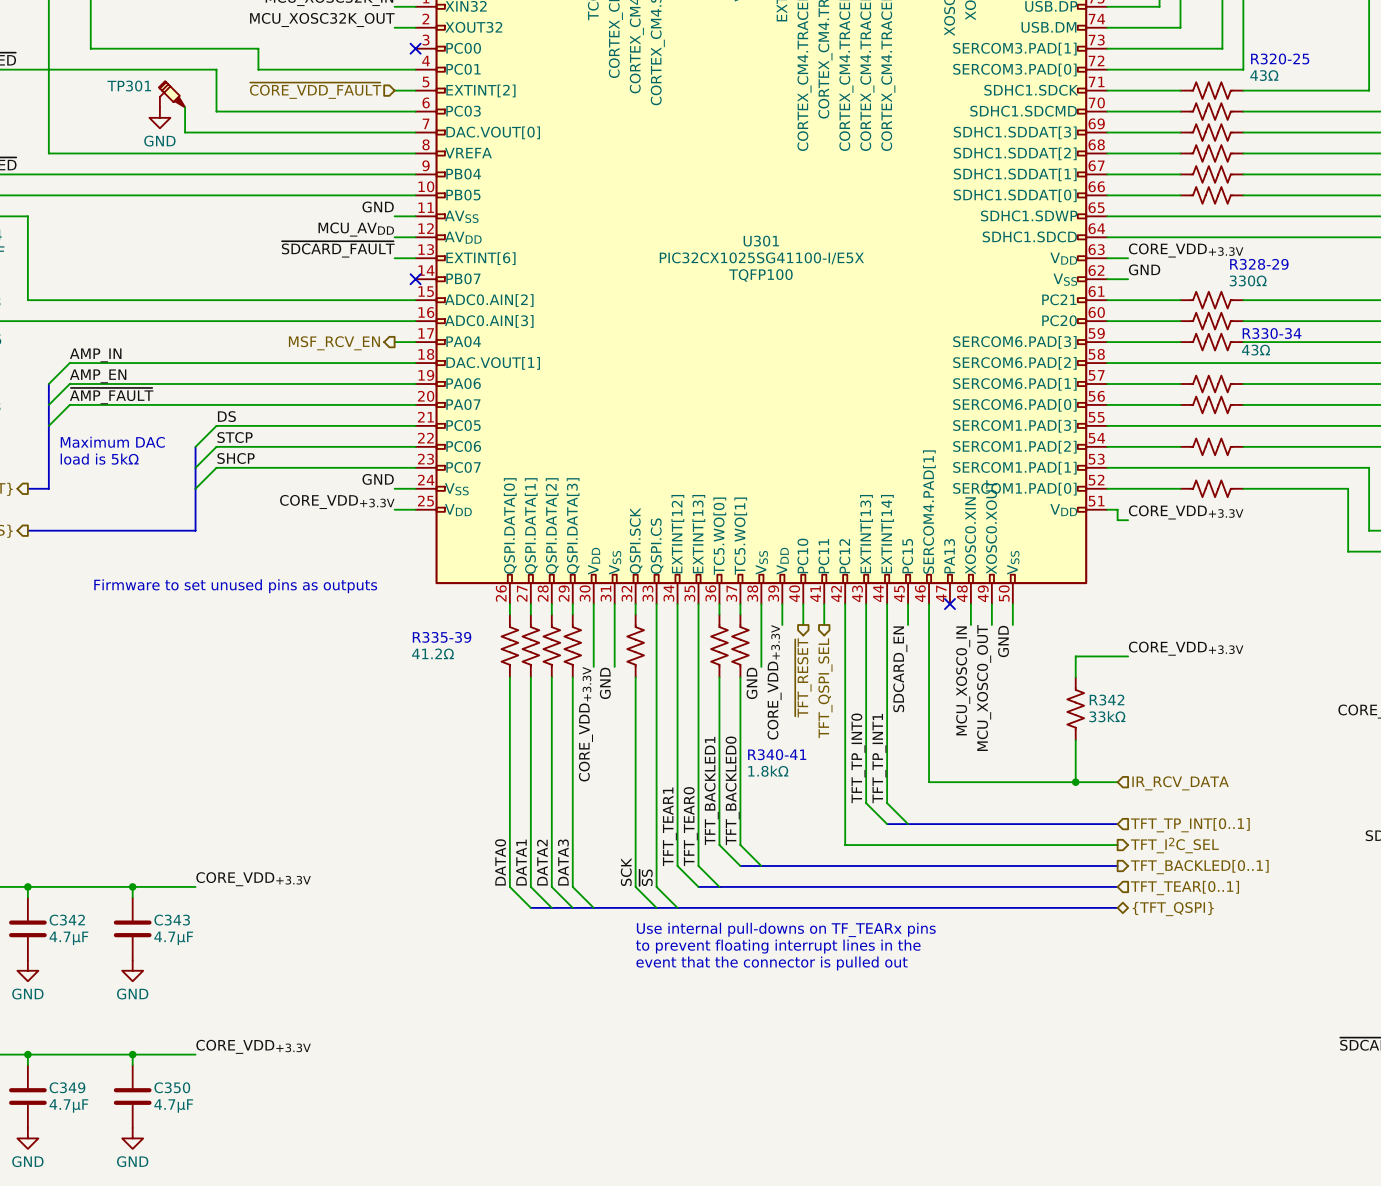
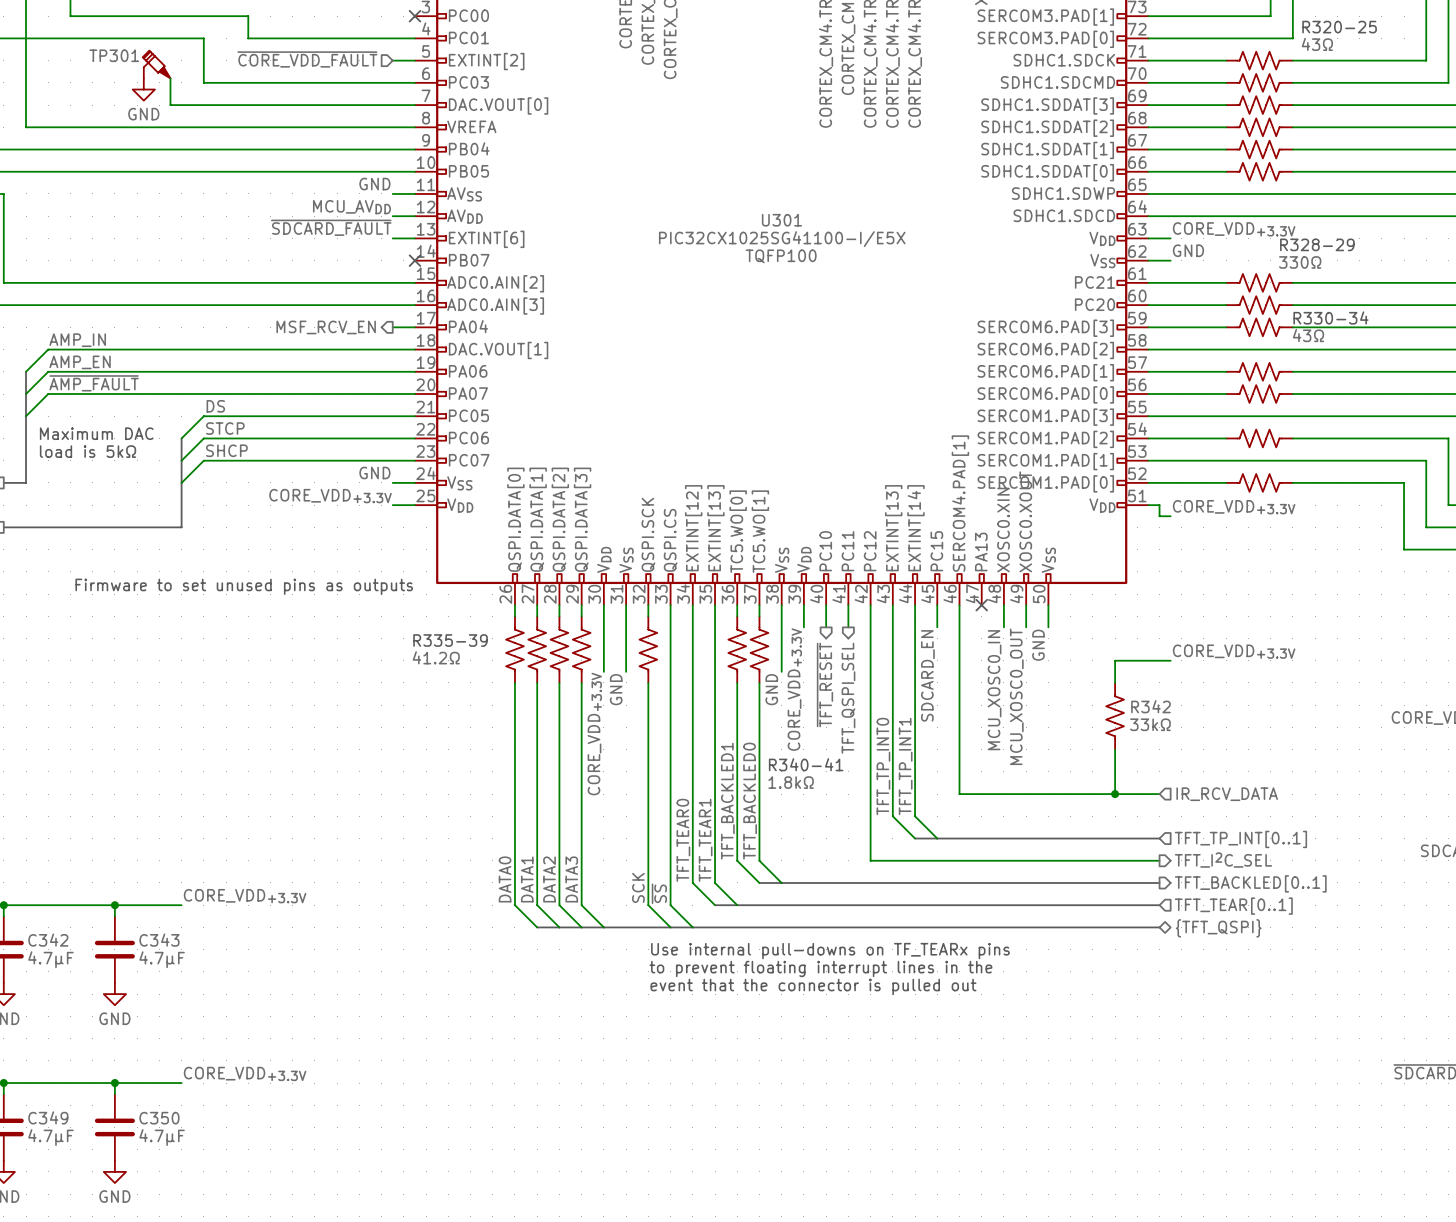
label: TFT_TEAR1 (669, 826) -> TFT_TEAR0 (683, 840)
label: TFT_TEAR0 (690, 826) -> TFT_TEAR1 (705, 840)

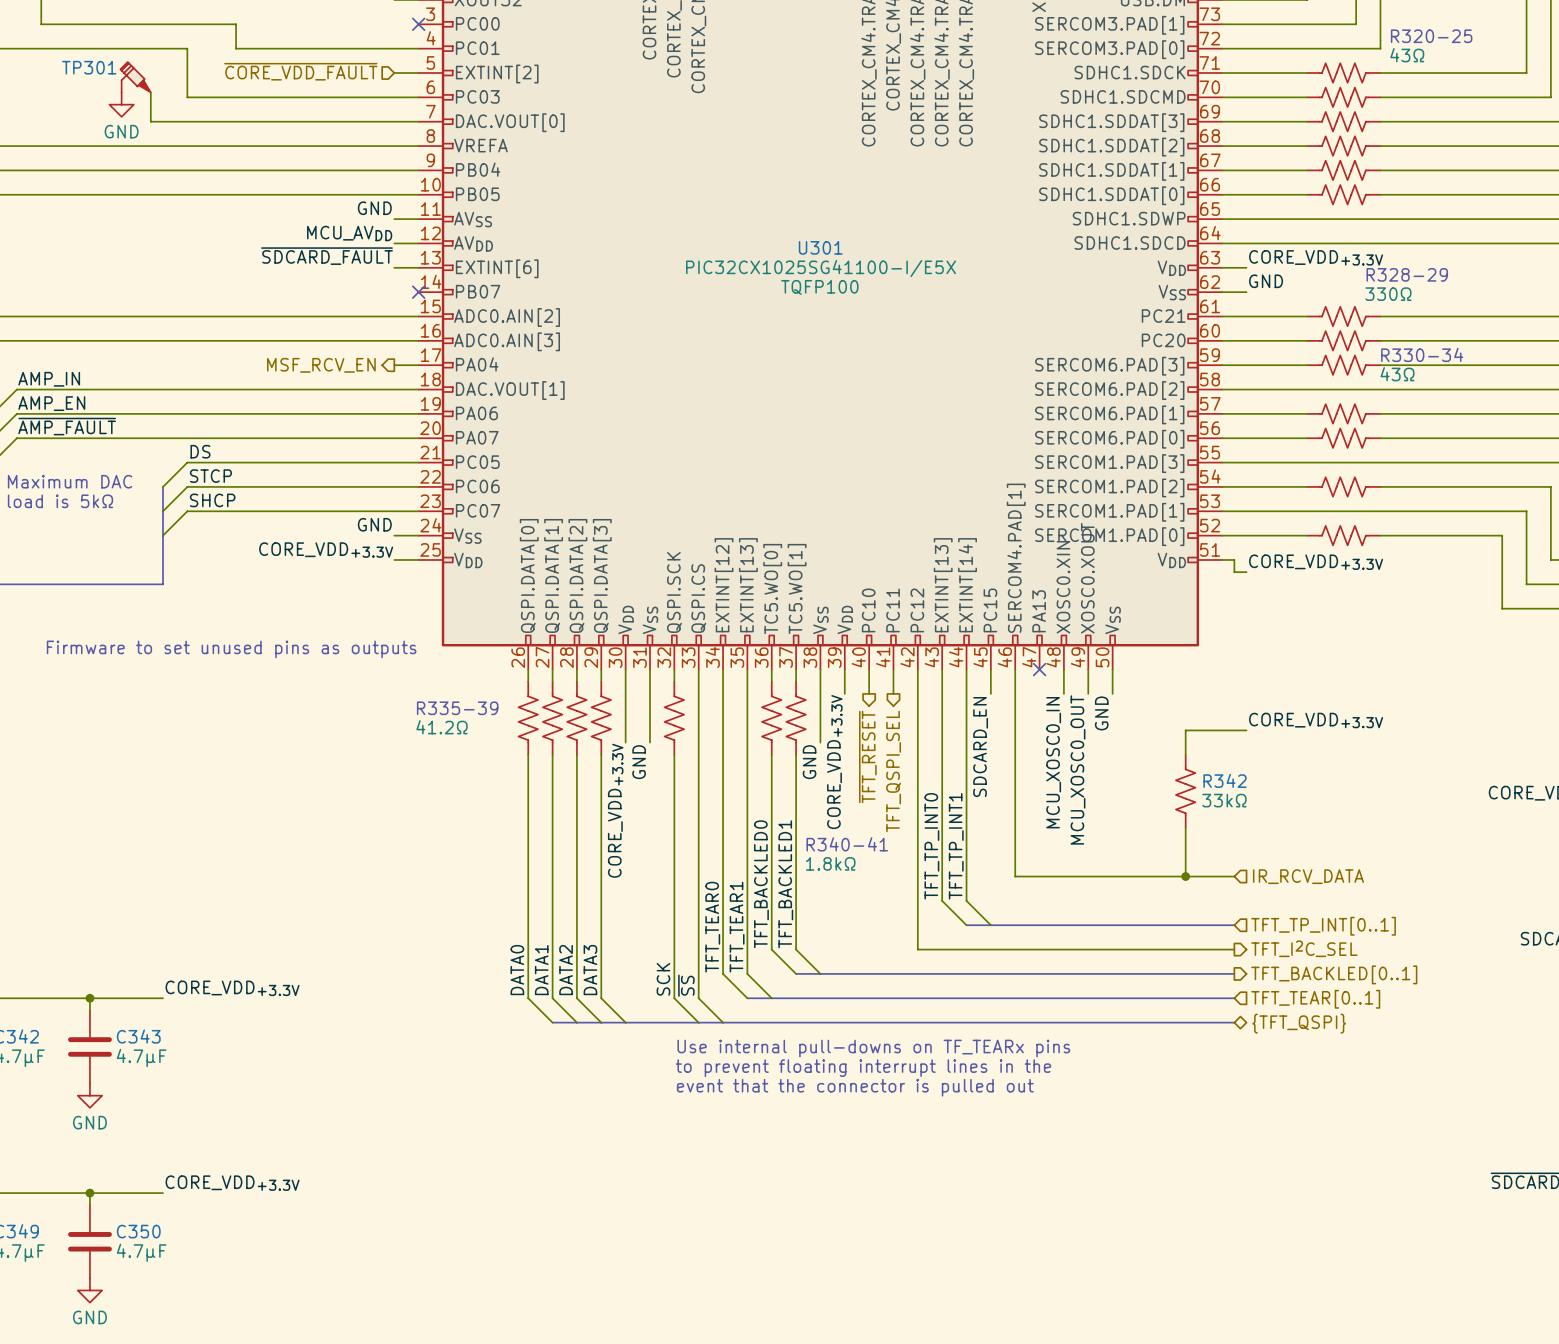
label: TFT_BACKLED1 (727, 801) -> TFT_BACKLED0 (761, 884)
label: TFT_BACKLED0 (750, 801) -> TFT_BACKLED1 (785, 884)

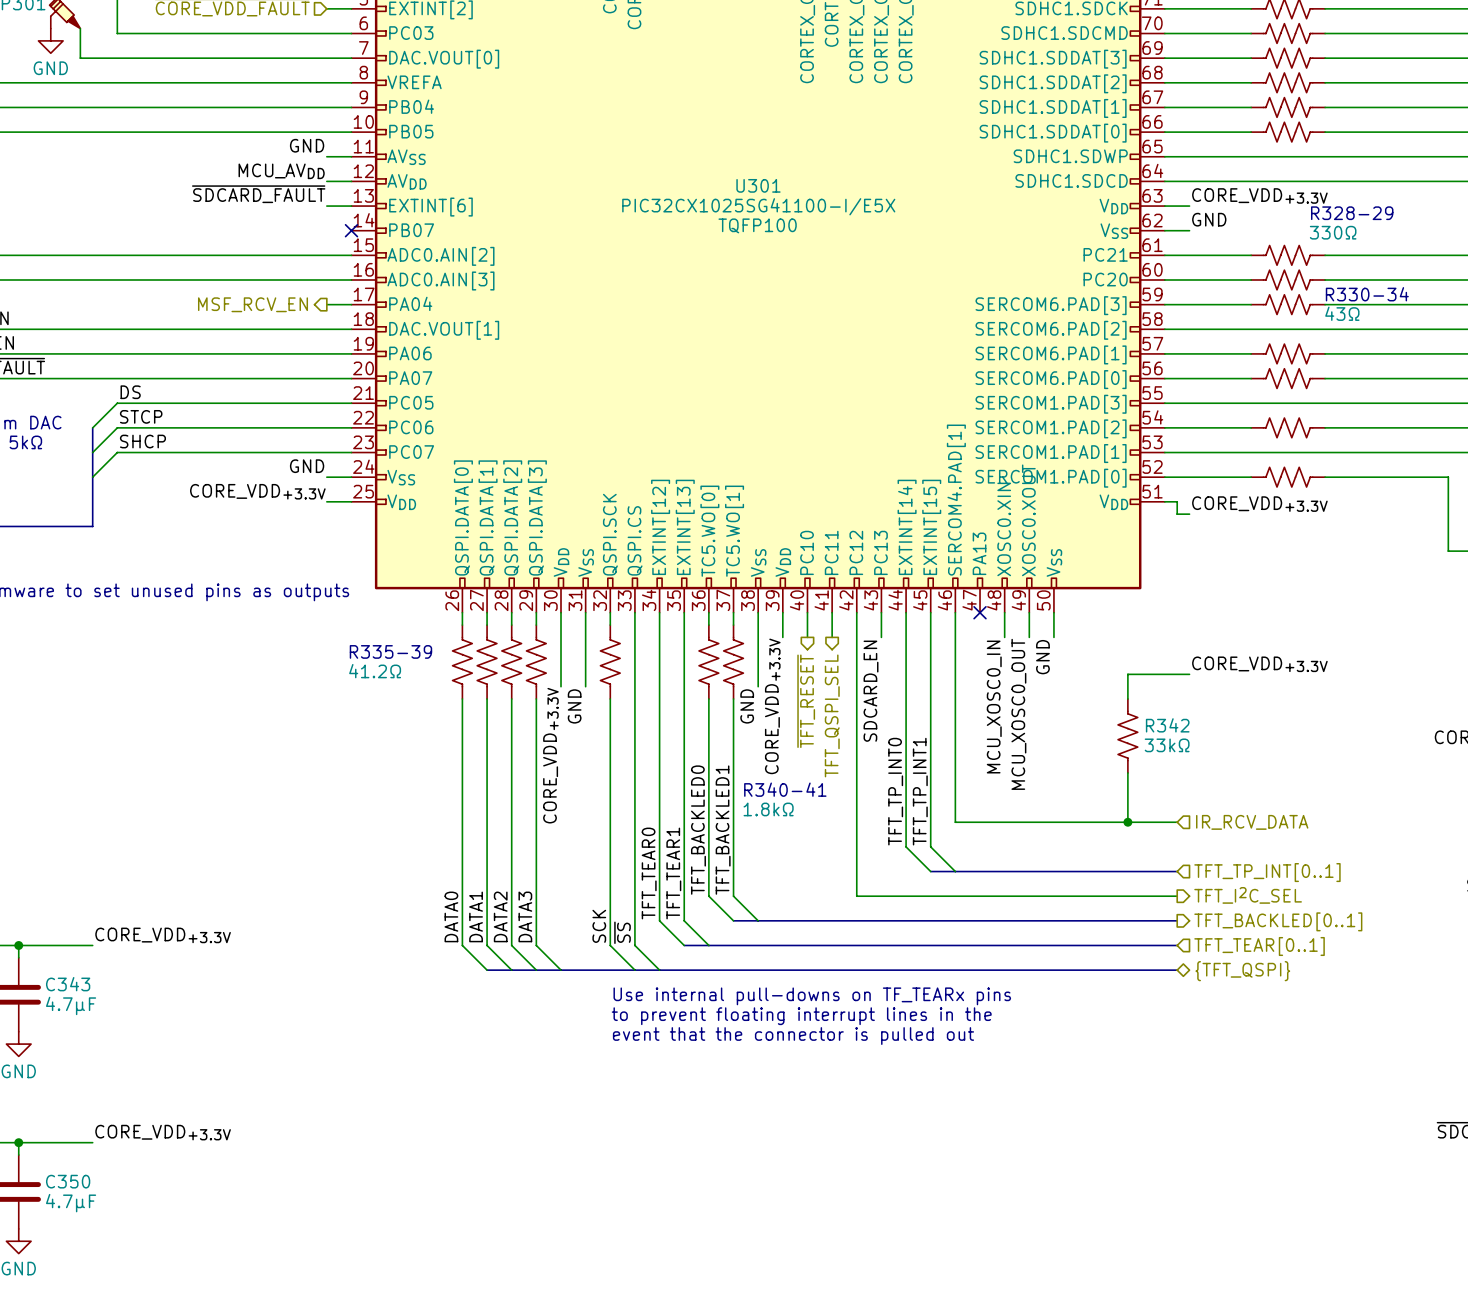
U301 pin name: EXTINT[13] (943, 585) -> PC13 (880, 552)
U301 pin name: PC15 (990, 610) -> EXTINT[15] (931, 527)
wire: (942, 693) (942, 900) (966, 925) -> (930, 637) (930, 846) (955, 871)
label position: SDCARD_EN (980, 747) -> SDCARD_EN (871, 691)
label: TFT_TP_INT0 (931, 846) -> none
label: TFT_TP_INT1 (956, 846) -> TFT_TP_INT0 (895, 791)
label: none -> TFT_TP_INT1 (920, 791)
bus: (966, 925) (990, 925) -> none

